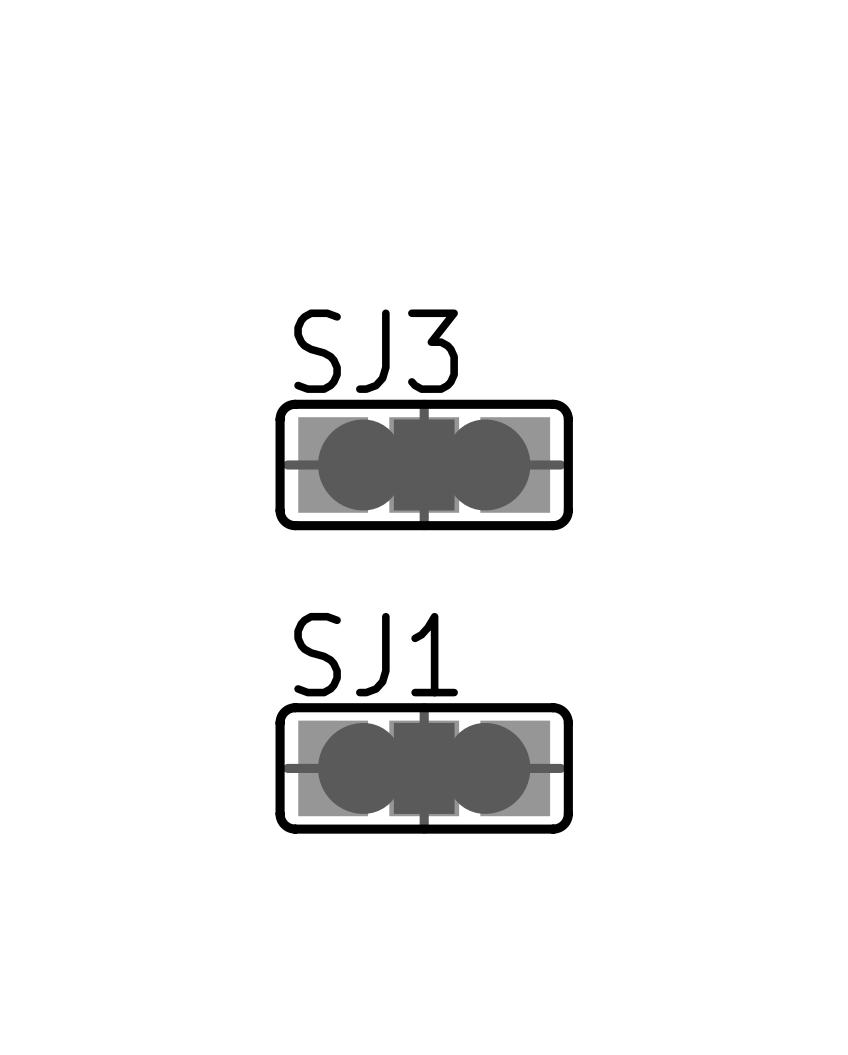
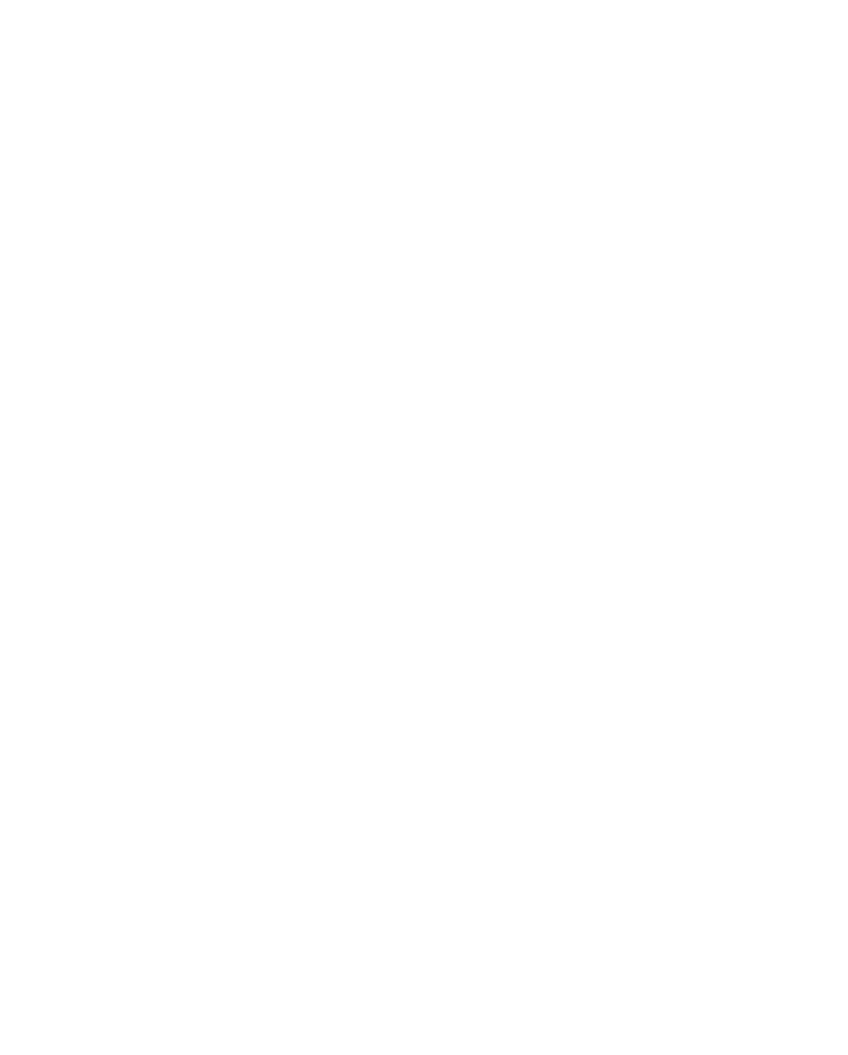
SJ3: (424, 464) -> none
SJ1: (424, 768) -> none

